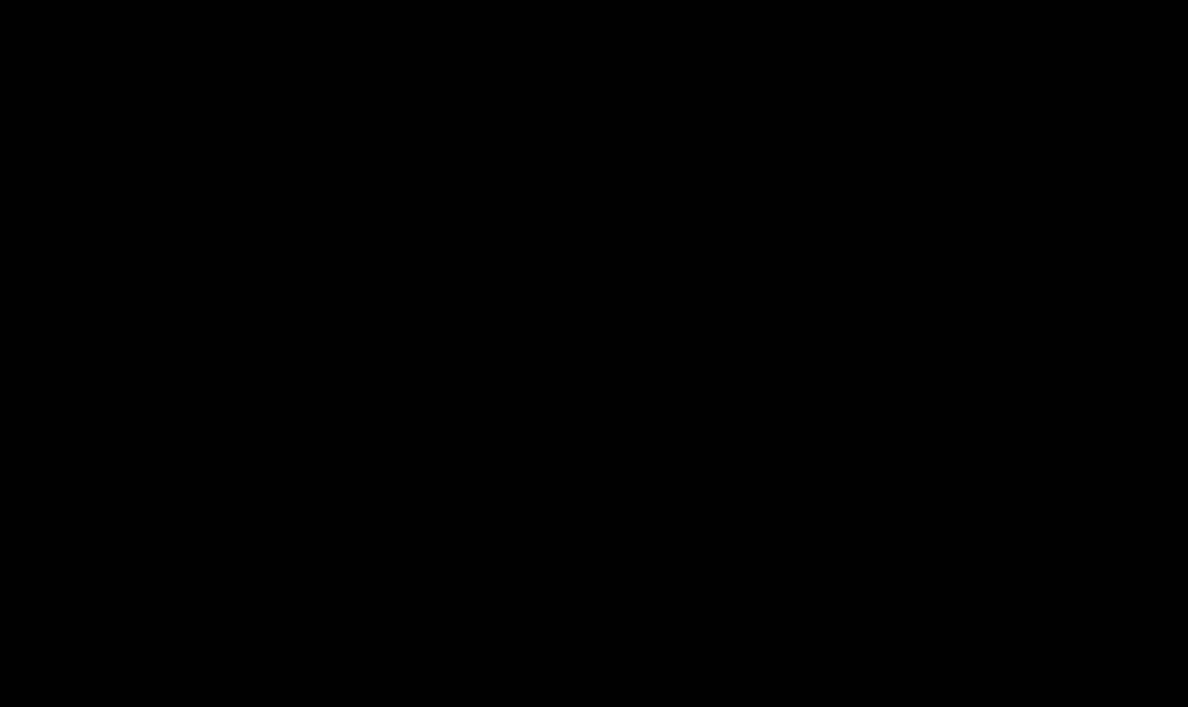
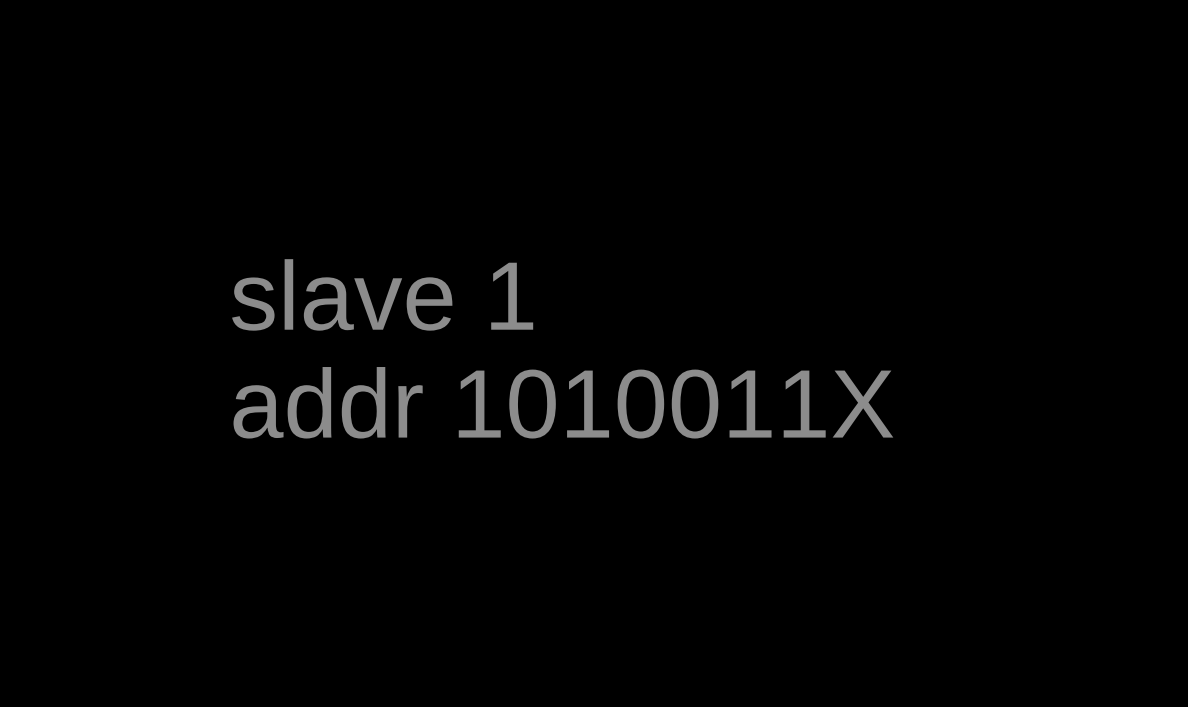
text: none -> slave 1 (382, 294)
text: none -> addr 1010011X (563, 402)

